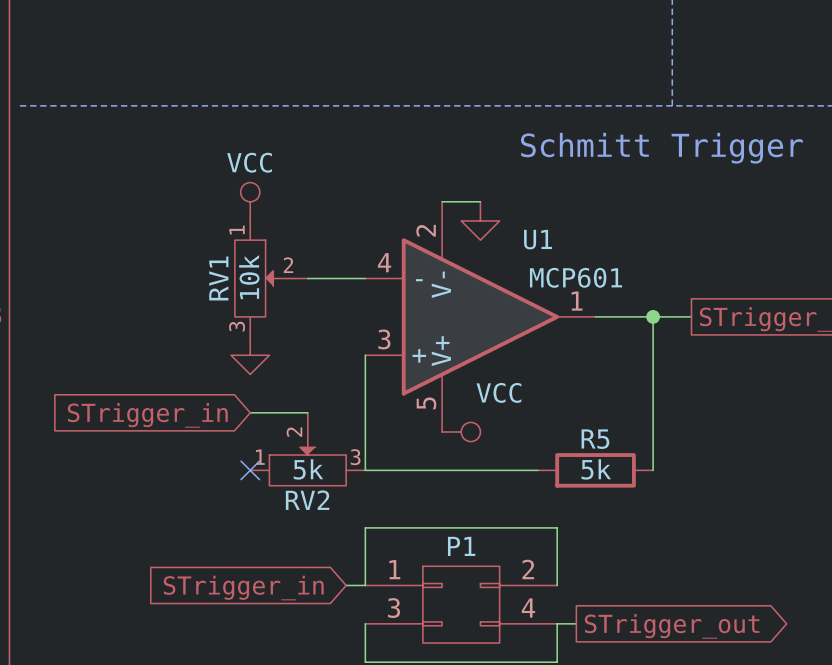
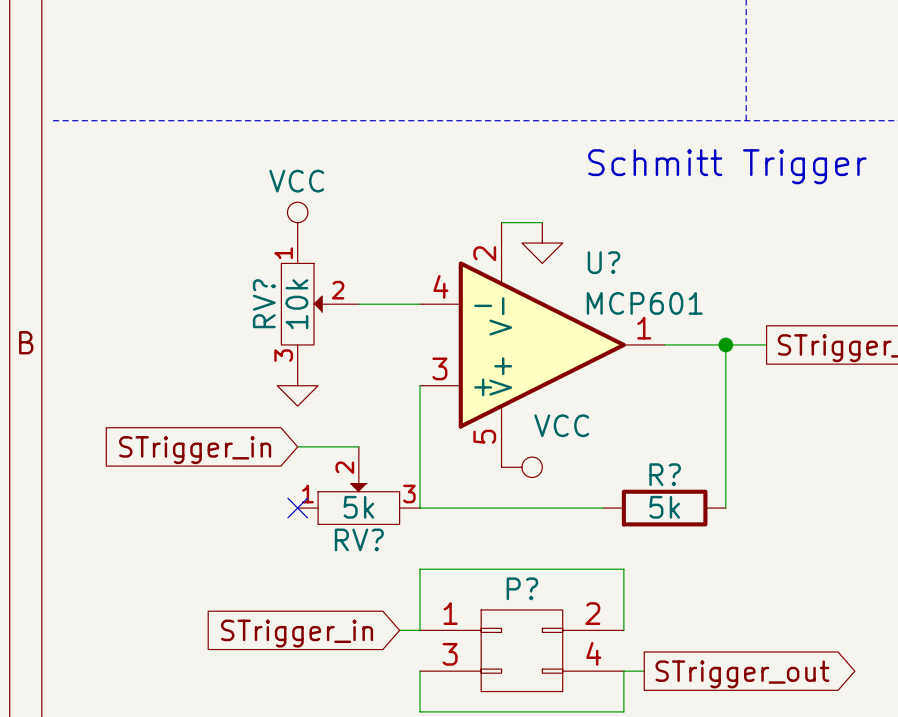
U1 name: U1 (538, 239) -> U? (603, 262)
RV1 name: RV1 (218, 278) -> RV? (264, 303)
R5 name: R5 (595, 439) -> R? (665, 474)
RV2 name: RV2 (307, 500) -> RV? (359, 539)
P1 name: P1 (461, 546) -> P? (522, 588)

